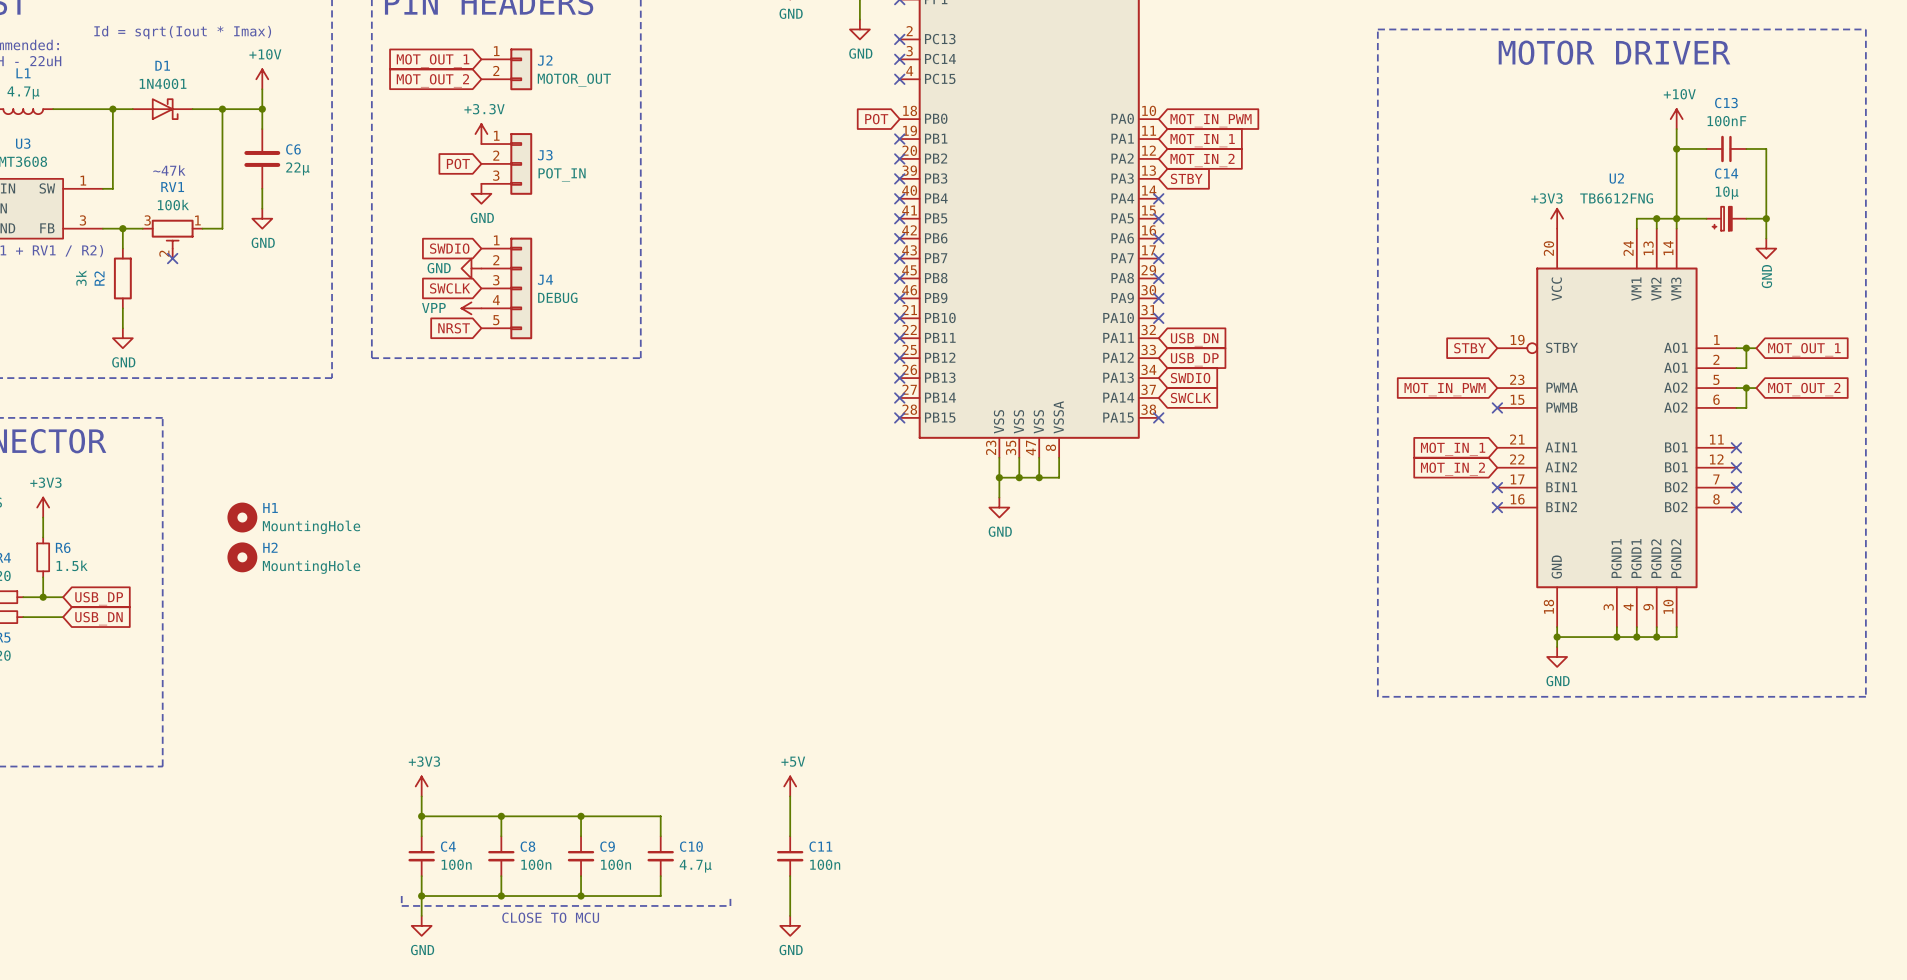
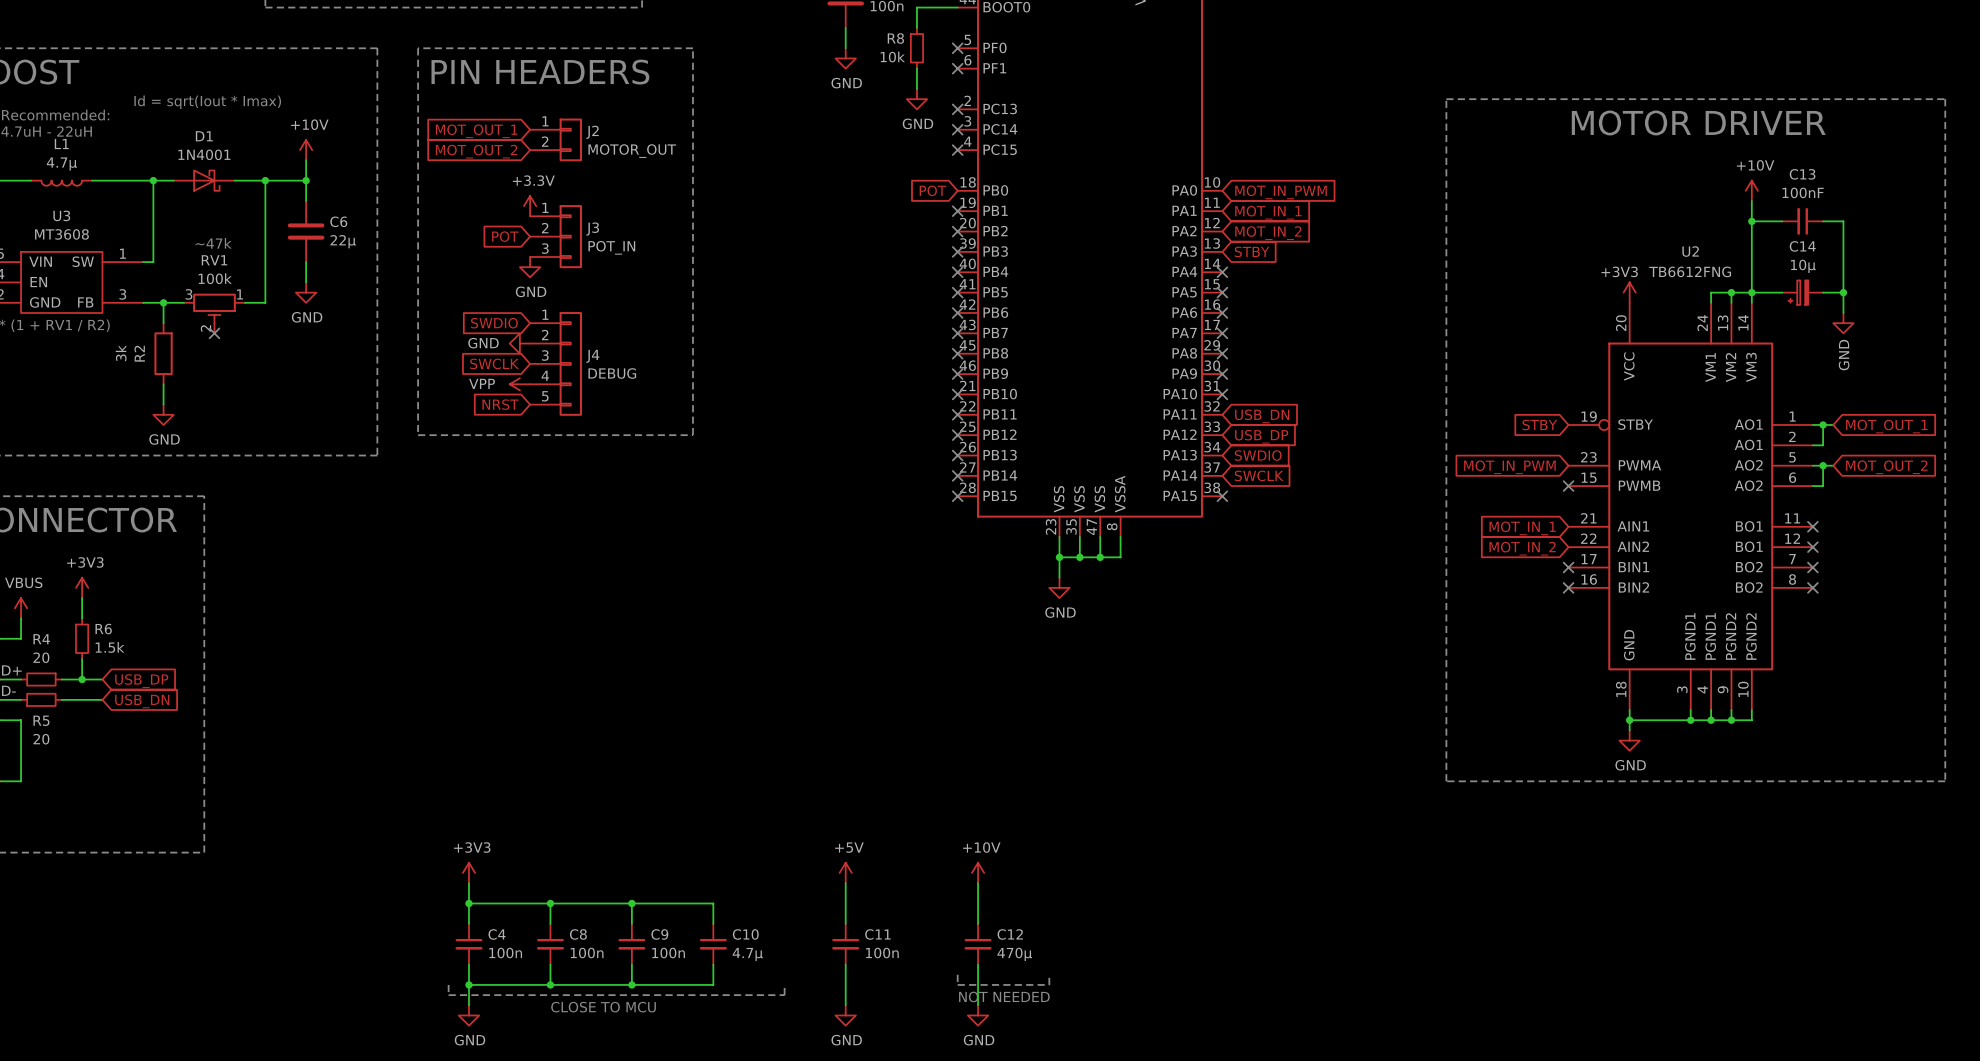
H1: MountingHole (242, 517) -> none
H2: MountingHole (242, 557) -> none
power symbol: none -> +10V (978, 872)
wire: none -> (978, 883) (978, 923)
C12: none -> 470µ (978, 944)
wire: none -> (978, 964) (978, 1005)
line: none -> (957, 974) (957, 984) (1049, 984) (1049, 974)
text: none -> NOT NEEDED (1004, 996)
power symbol: none -> GND (978, 1015)

